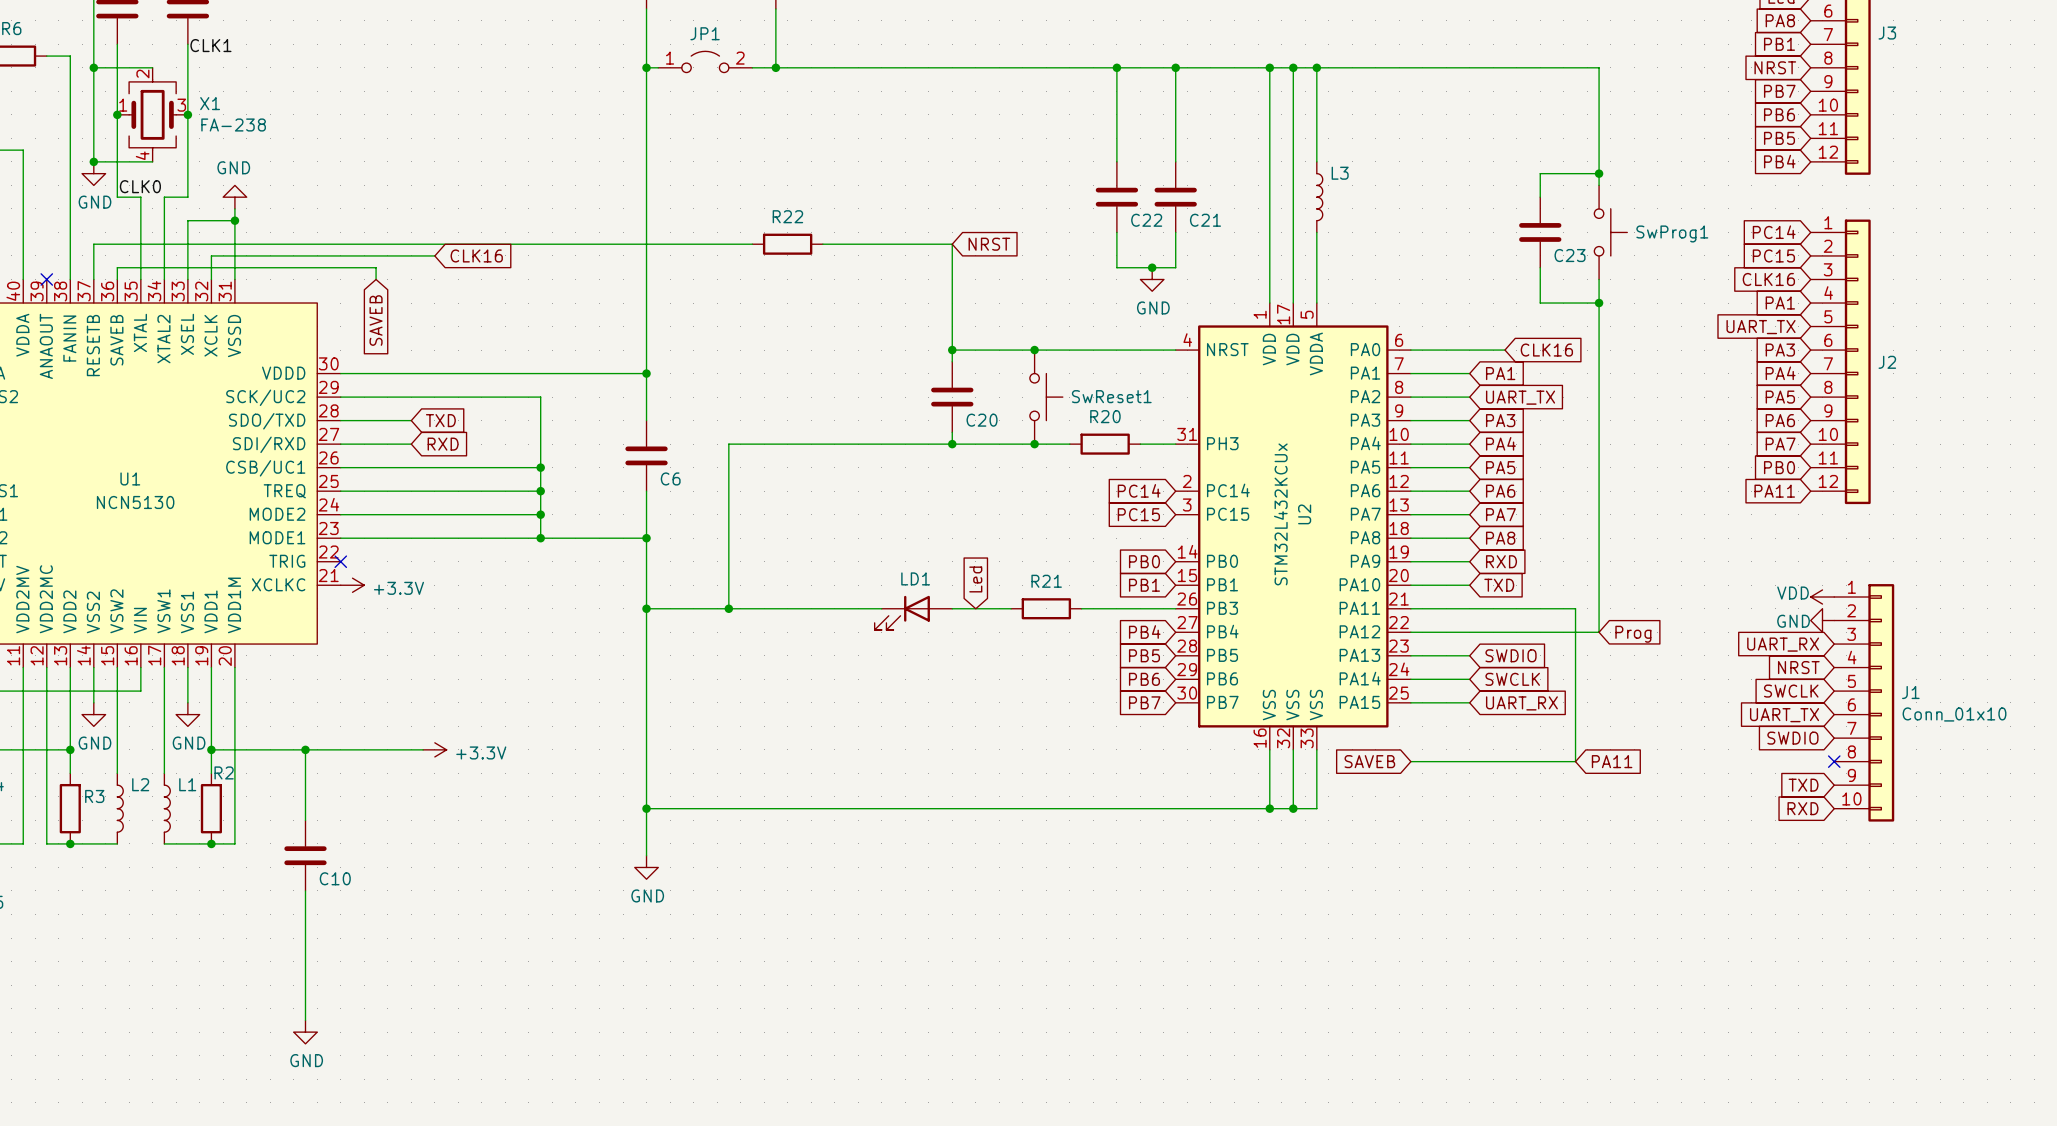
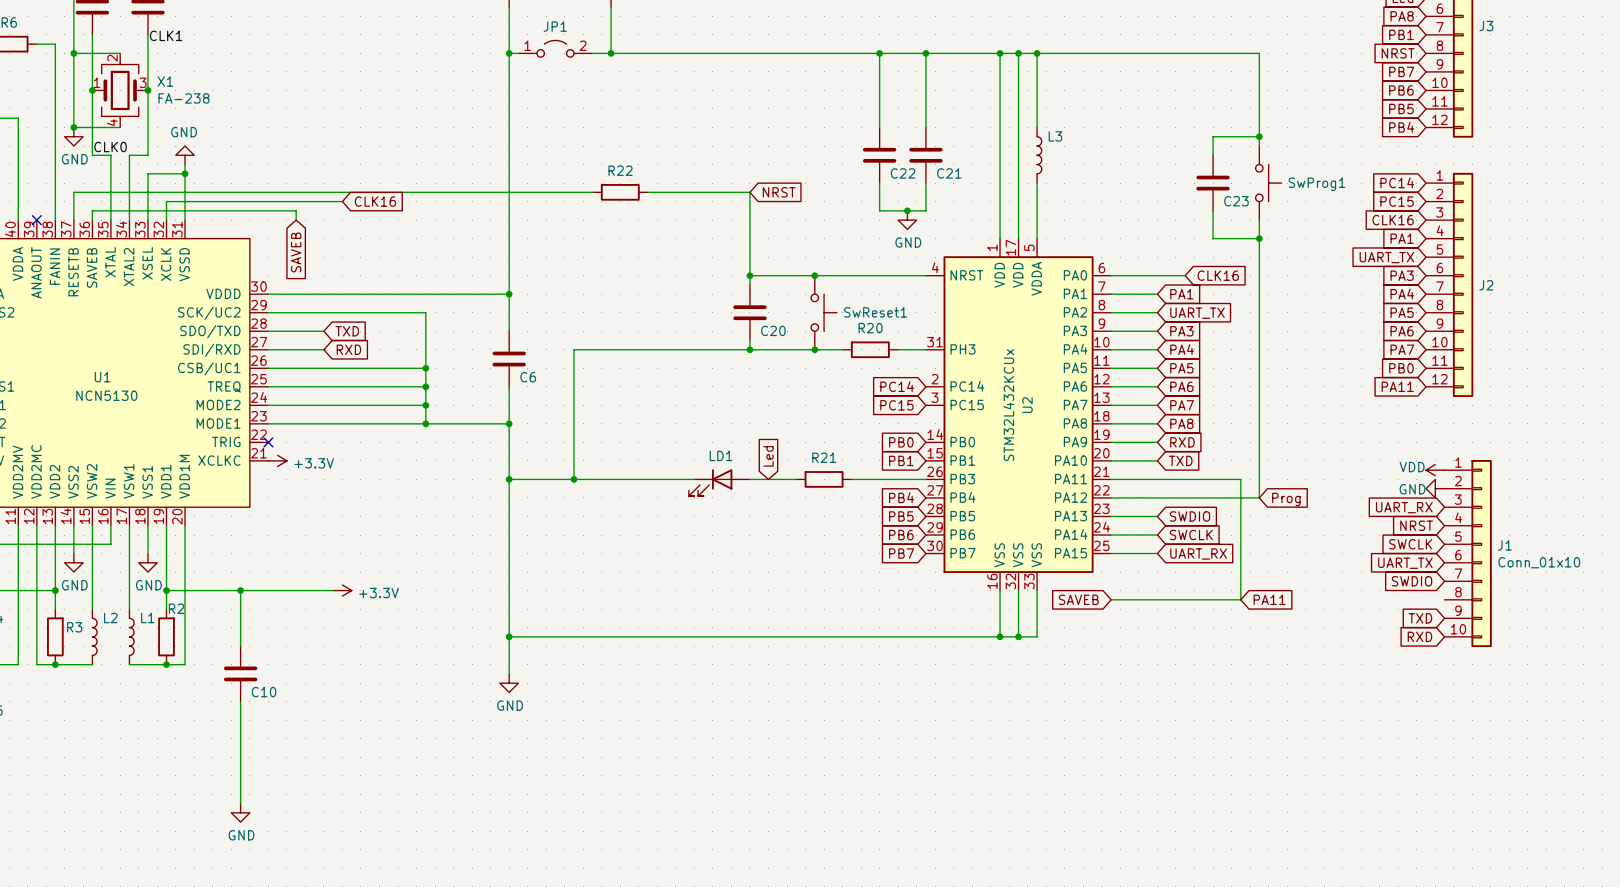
no-connect mark: (1834, 761) -> none

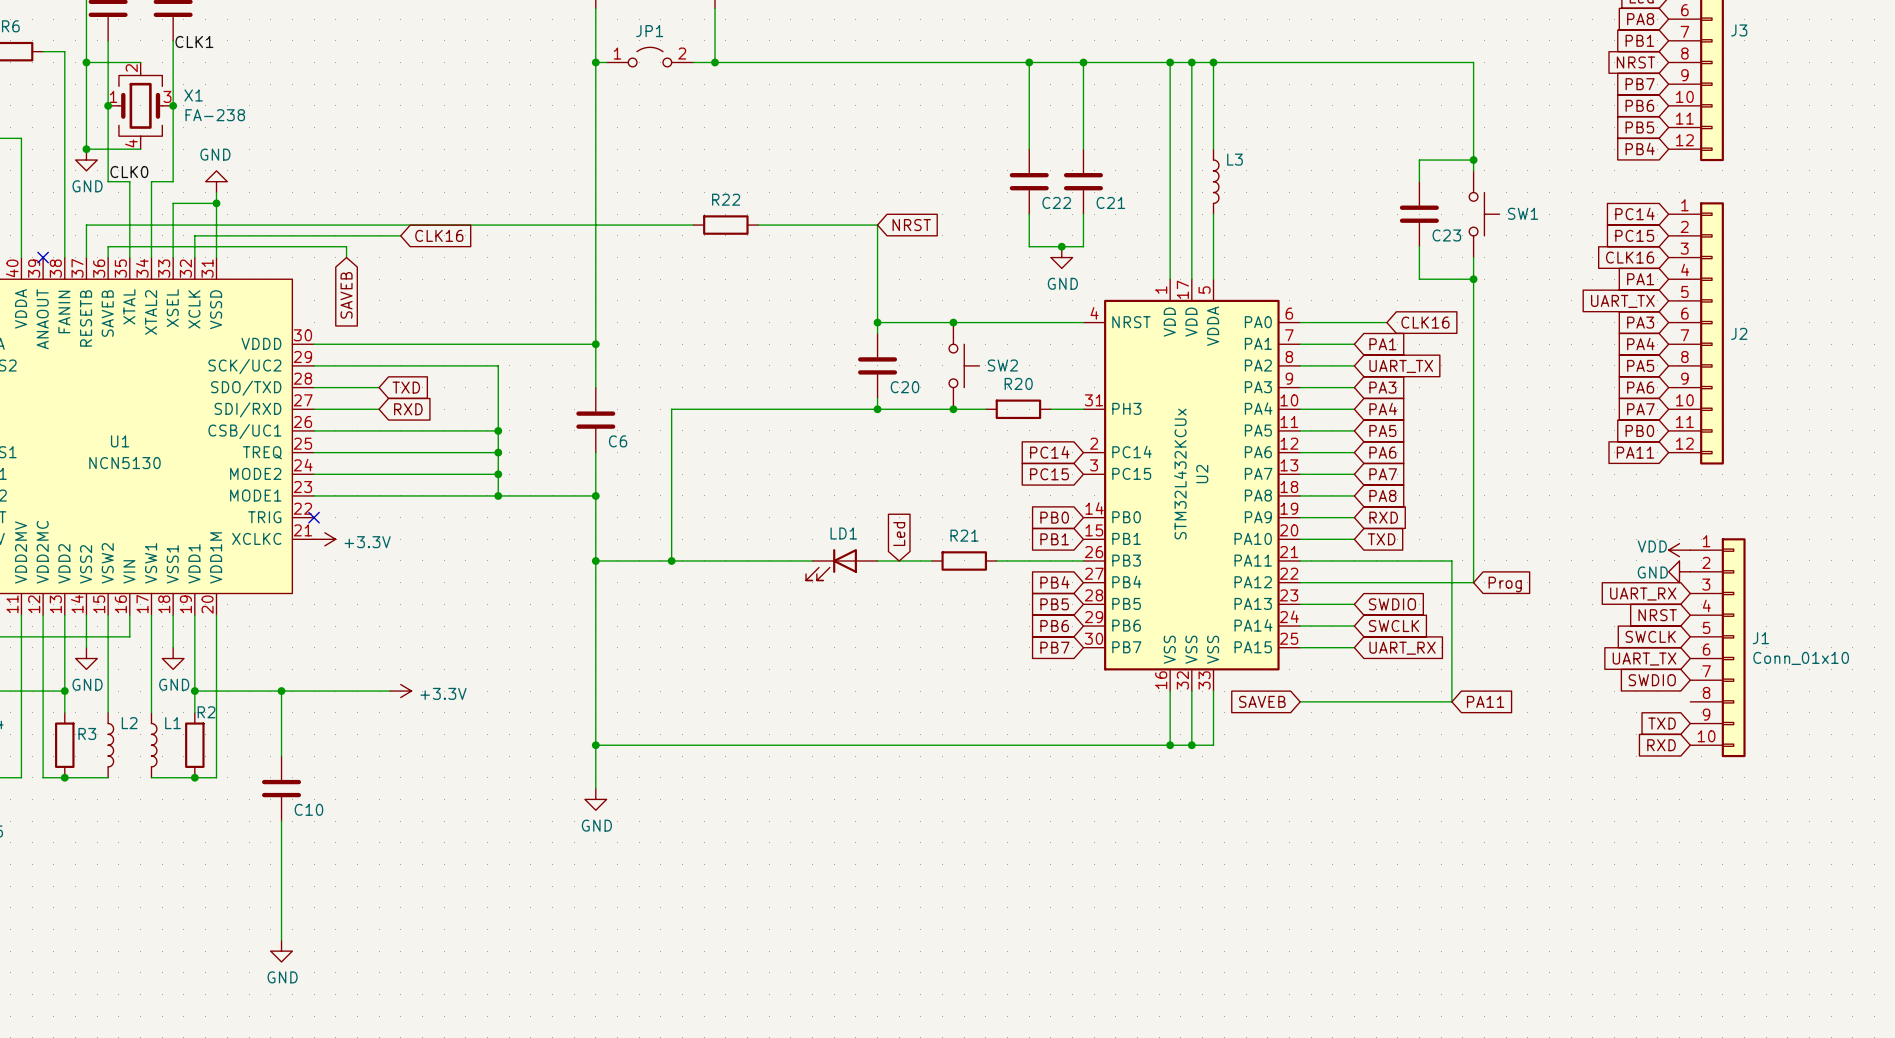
SwProg1 name: SwProg1 (1317, 184) -> SW1 (1523, 213)
SwReset1 name: SwReset1 (875, 312) -> SW2 (1002, 365)

